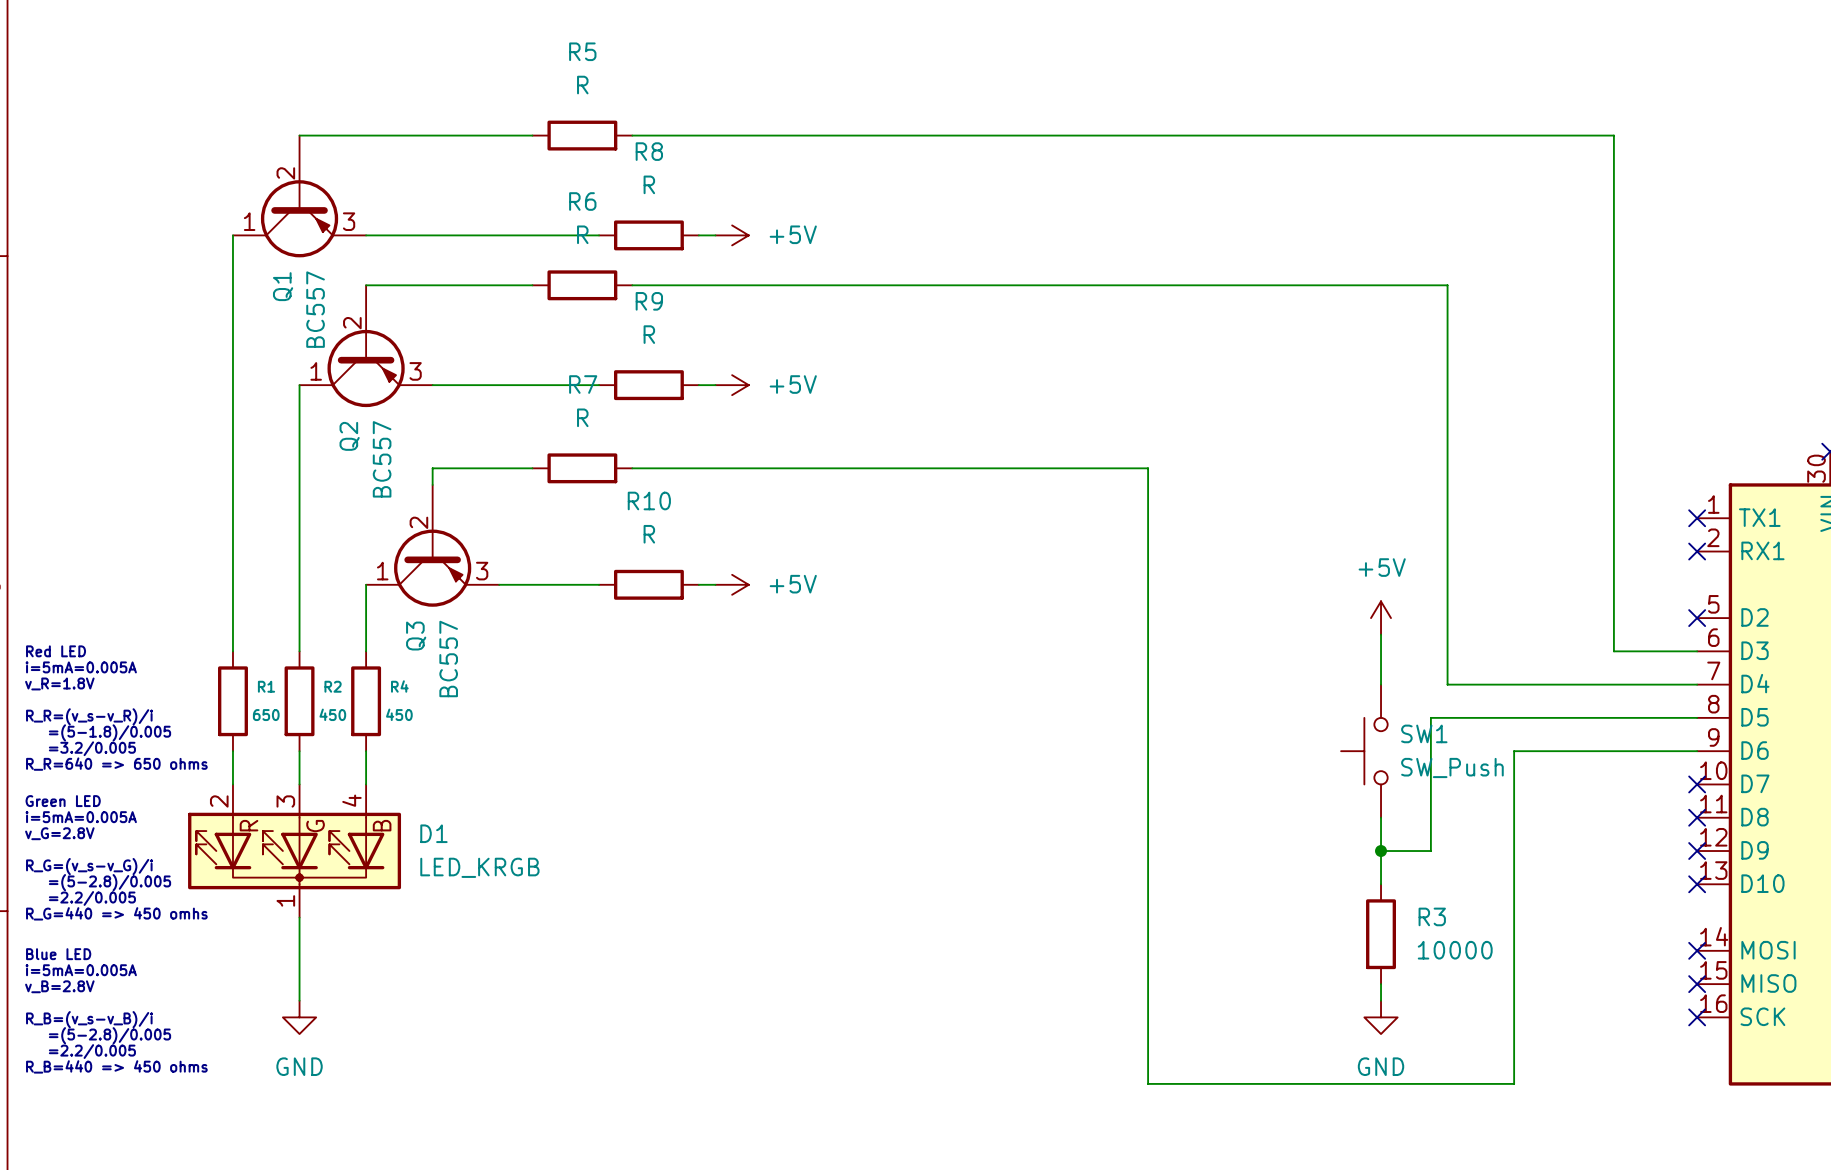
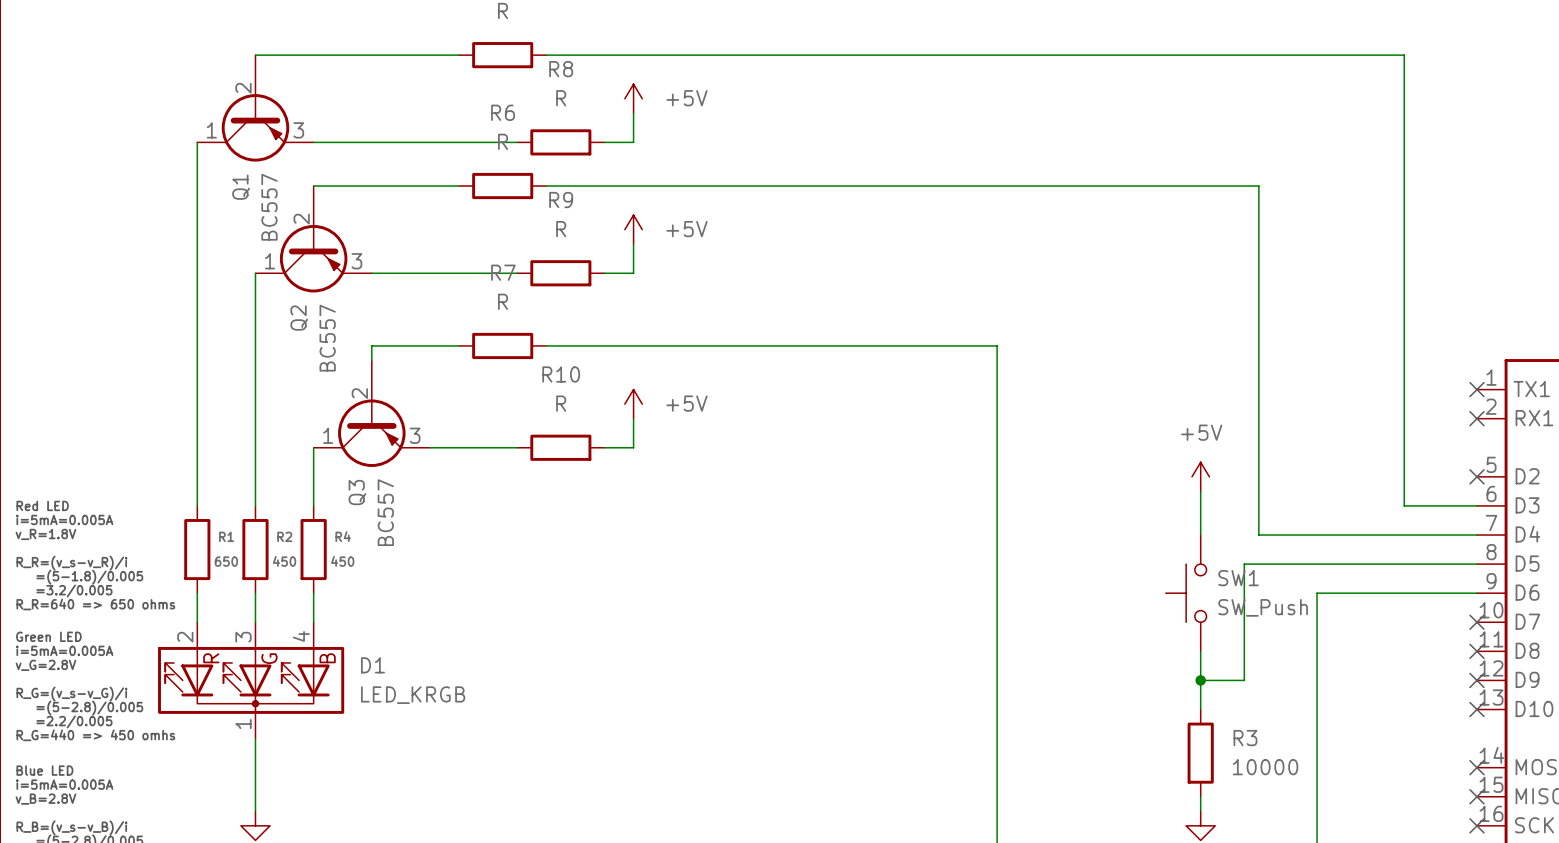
power symbol: none -> +5V (633, 98)
wire: none -> (633, 113) (633, 142) (619, 142)
power symbol: +5V (732, 235) -> none
power symbol: none -> +5V (633, 229)
wire: none -> (633, 244) (633, 273) (619, 273)
power symbol: +5V (732, 385) -> none
wire: none -> (633, 418) (633, 447) (619, 447)
power symbol rotation: 0° (732, 584) -> 90° counterclockwise (633, 404)
power symbol position: +5V (732, 584) -> +5V (633, 404)

